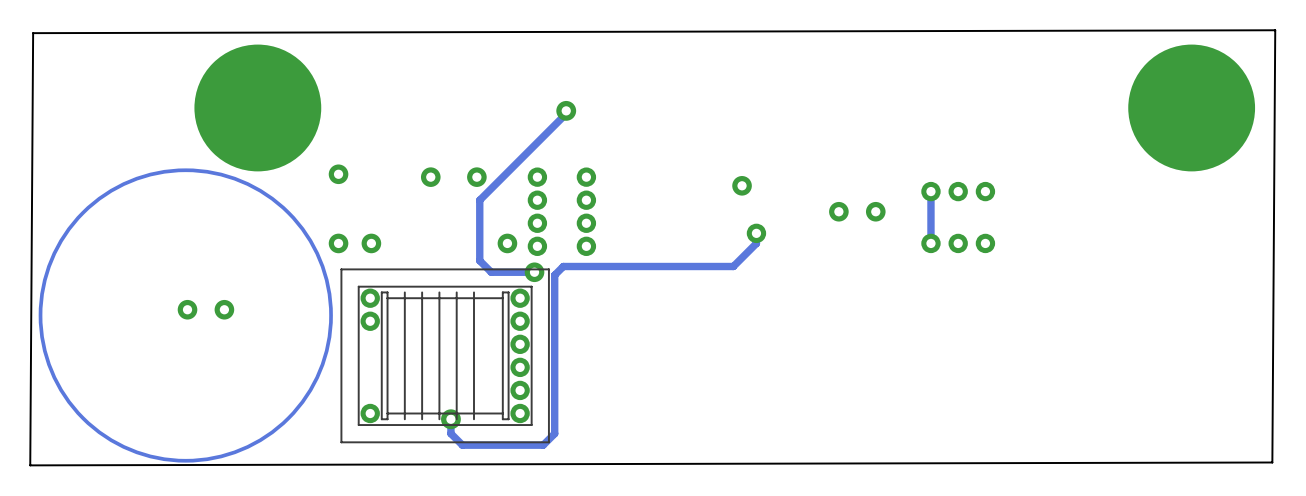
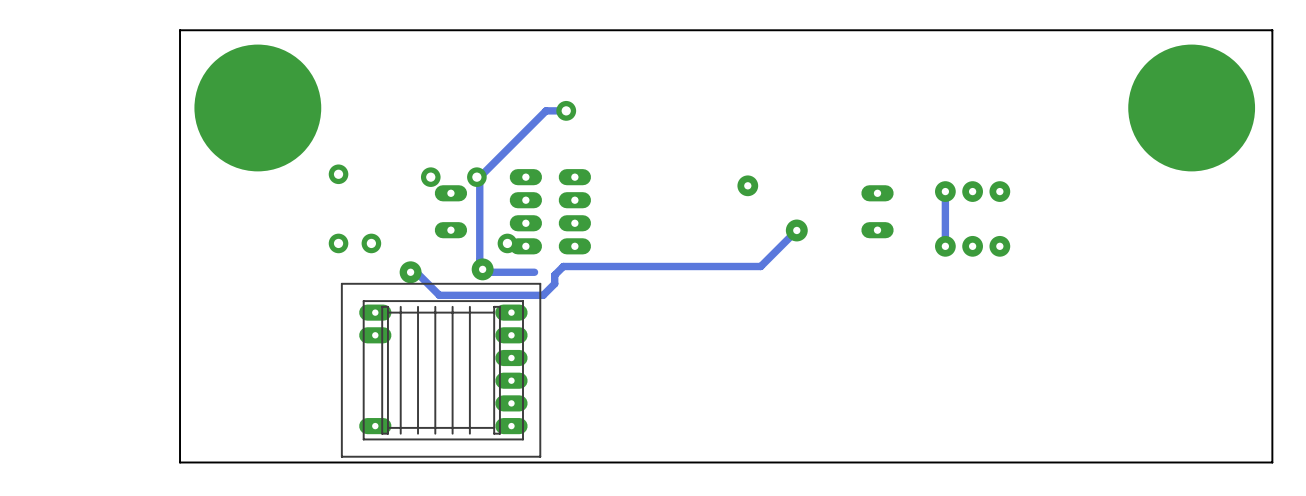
board edge: (1275, 30) (33, 33) (30, 465) (1272, 462) (1275, 30) -> (1272, 30) (1272, 462) (180, 462) (180, 30) (1272, 30)
track: (566, 113) (479, 200) -> (566, 110) (546, 110) (479, 177) (479, 200)
drawing: [38, 168, 333, 463] -> none
part footprint: [732, 176, 752, 196] -> [737, 175, 759, 197]
track: (930, 191) (930, 243) -> none
track: none -> (945, 191) (945, 246)
part: (958, 191) -> none
part: none -> (972, 191)
part: none -> (450, 211)
part: none -> (525, 211)
part: (537, 211) -> none
part: none -> (574, 211)
part: (586, 211) -> none
part: (857, 211) -> none
part: none -> (877, 211)
via: none -> (796, 230)
track: (756, 233) (756, 243) (733, 266) -> (796, 230) (760, 266) (733, 266)
via: (756, 233) -> none
part: (958, 243) -> none
part: none -> (972, 246)
via: none -> (482, 269)
via: none -> (410, 272)
via: (534, 272) -> none
track: (554, 283) (554, 433) (543, 445) (462, 445) (450, 433) (450, 419) -> (554, 283) (543, 295) (439, 295) (416, 272) (410, 272)
part: (205, 309) -> none
part: (445, 355) -> none
part: none -> (441, 370)
via: (450, 419) -> none

